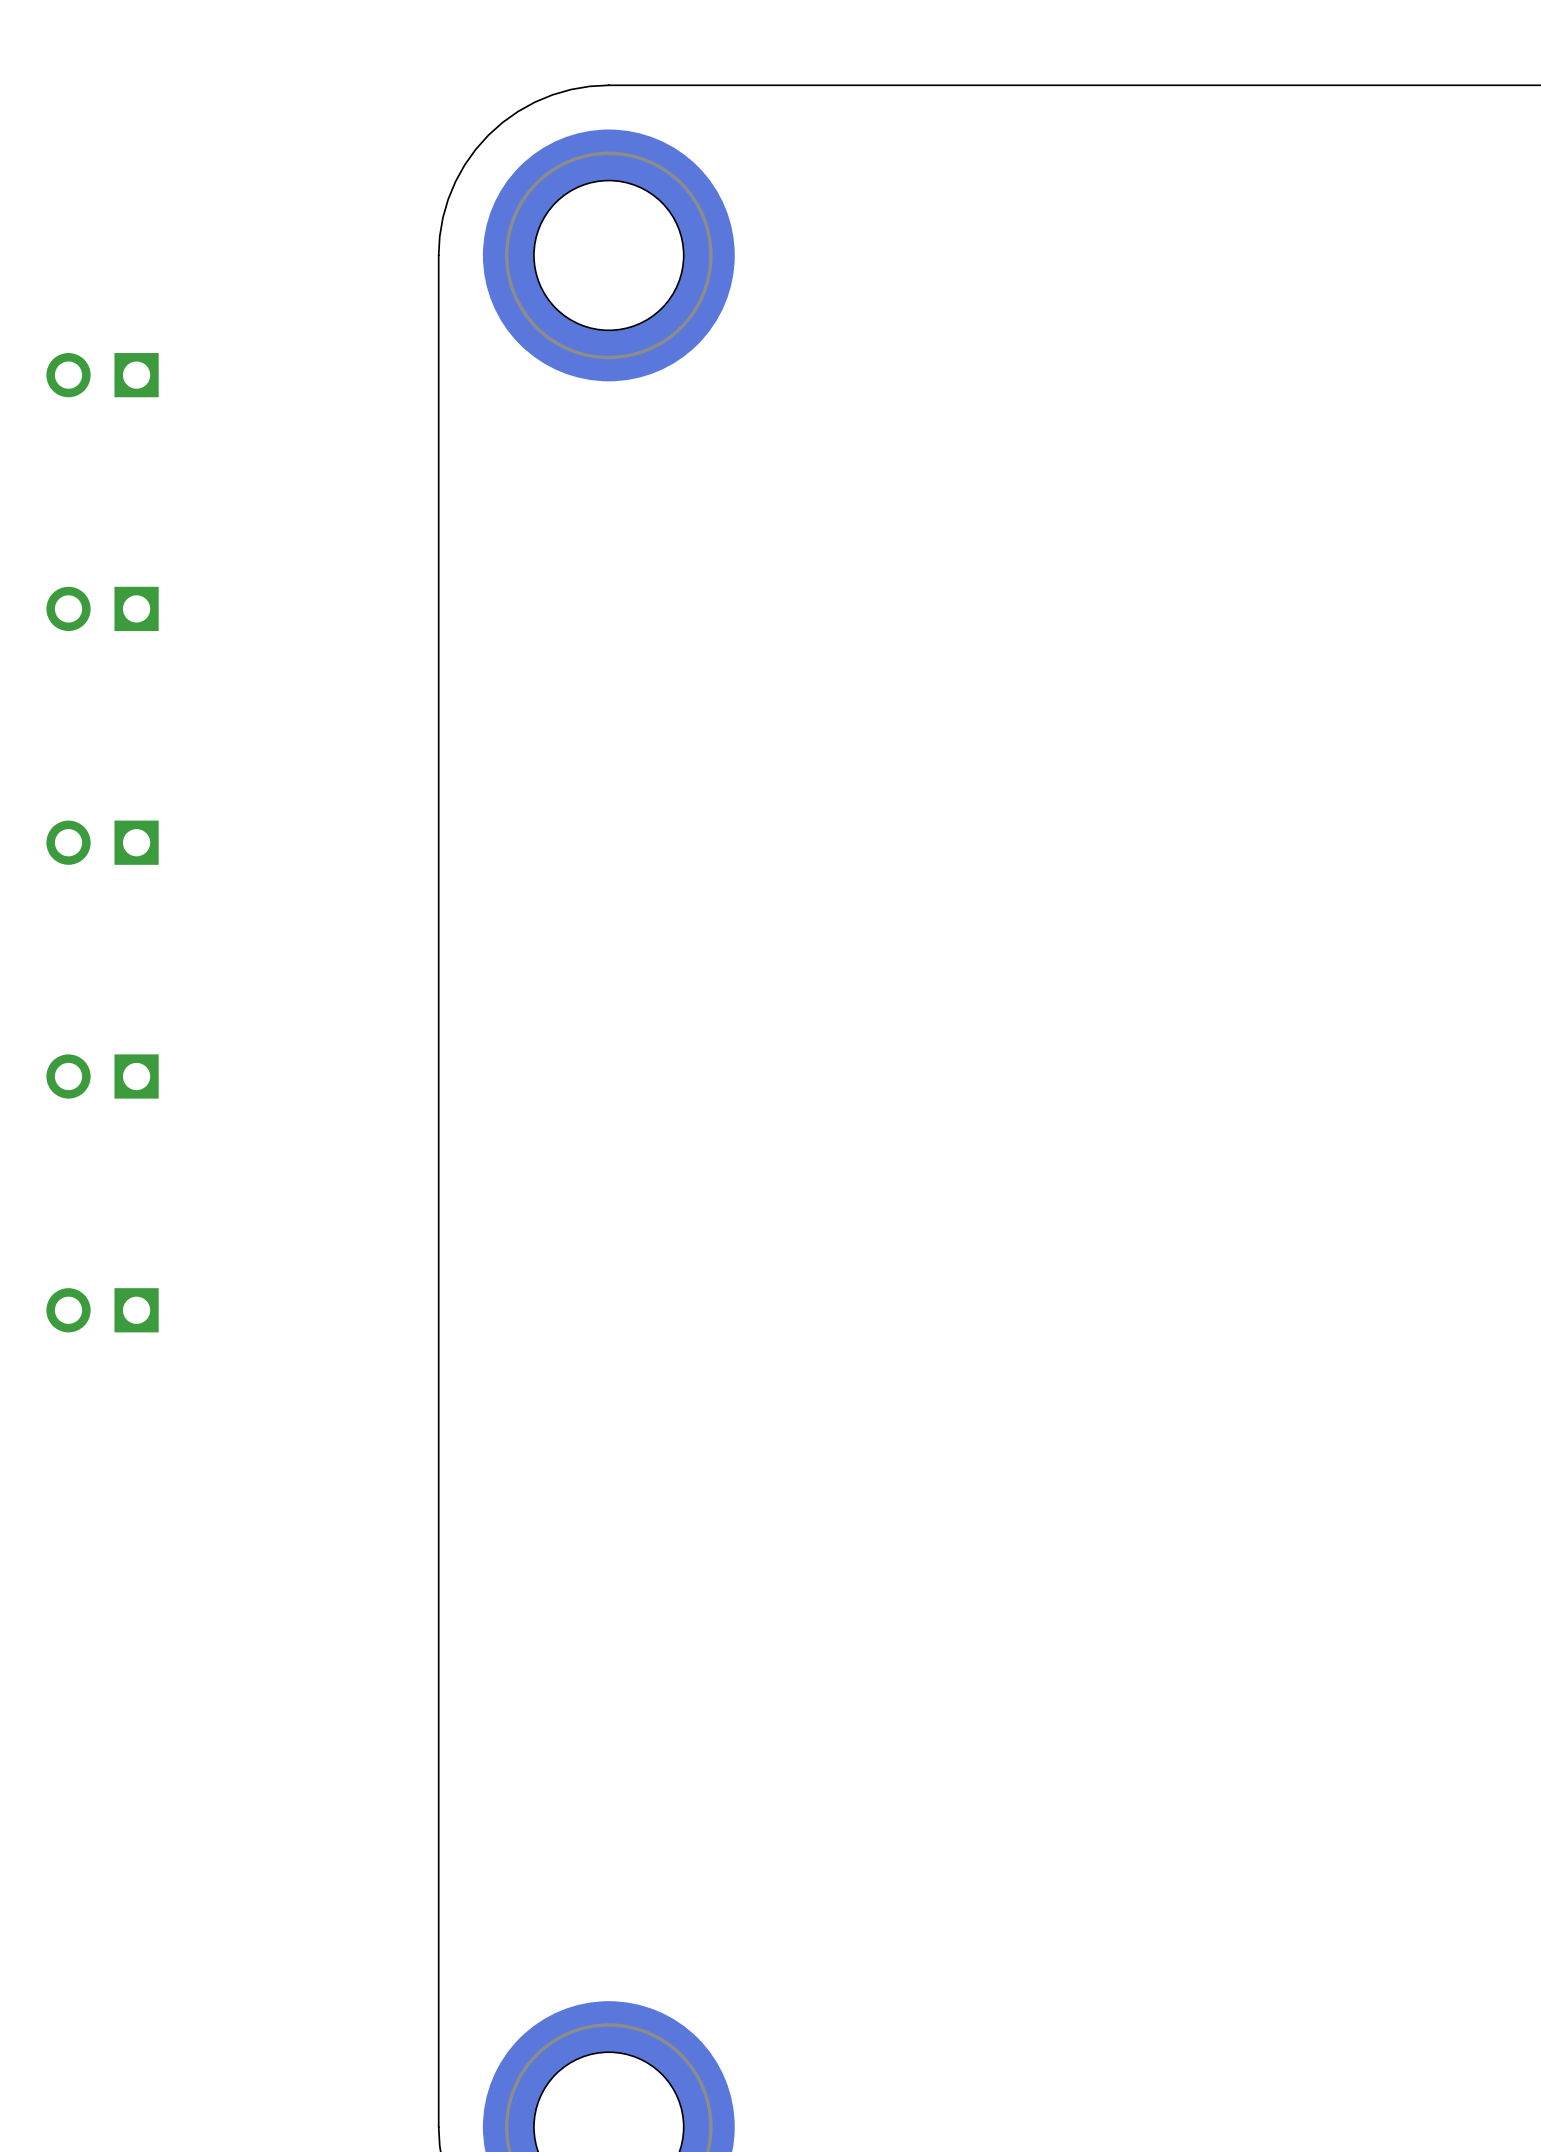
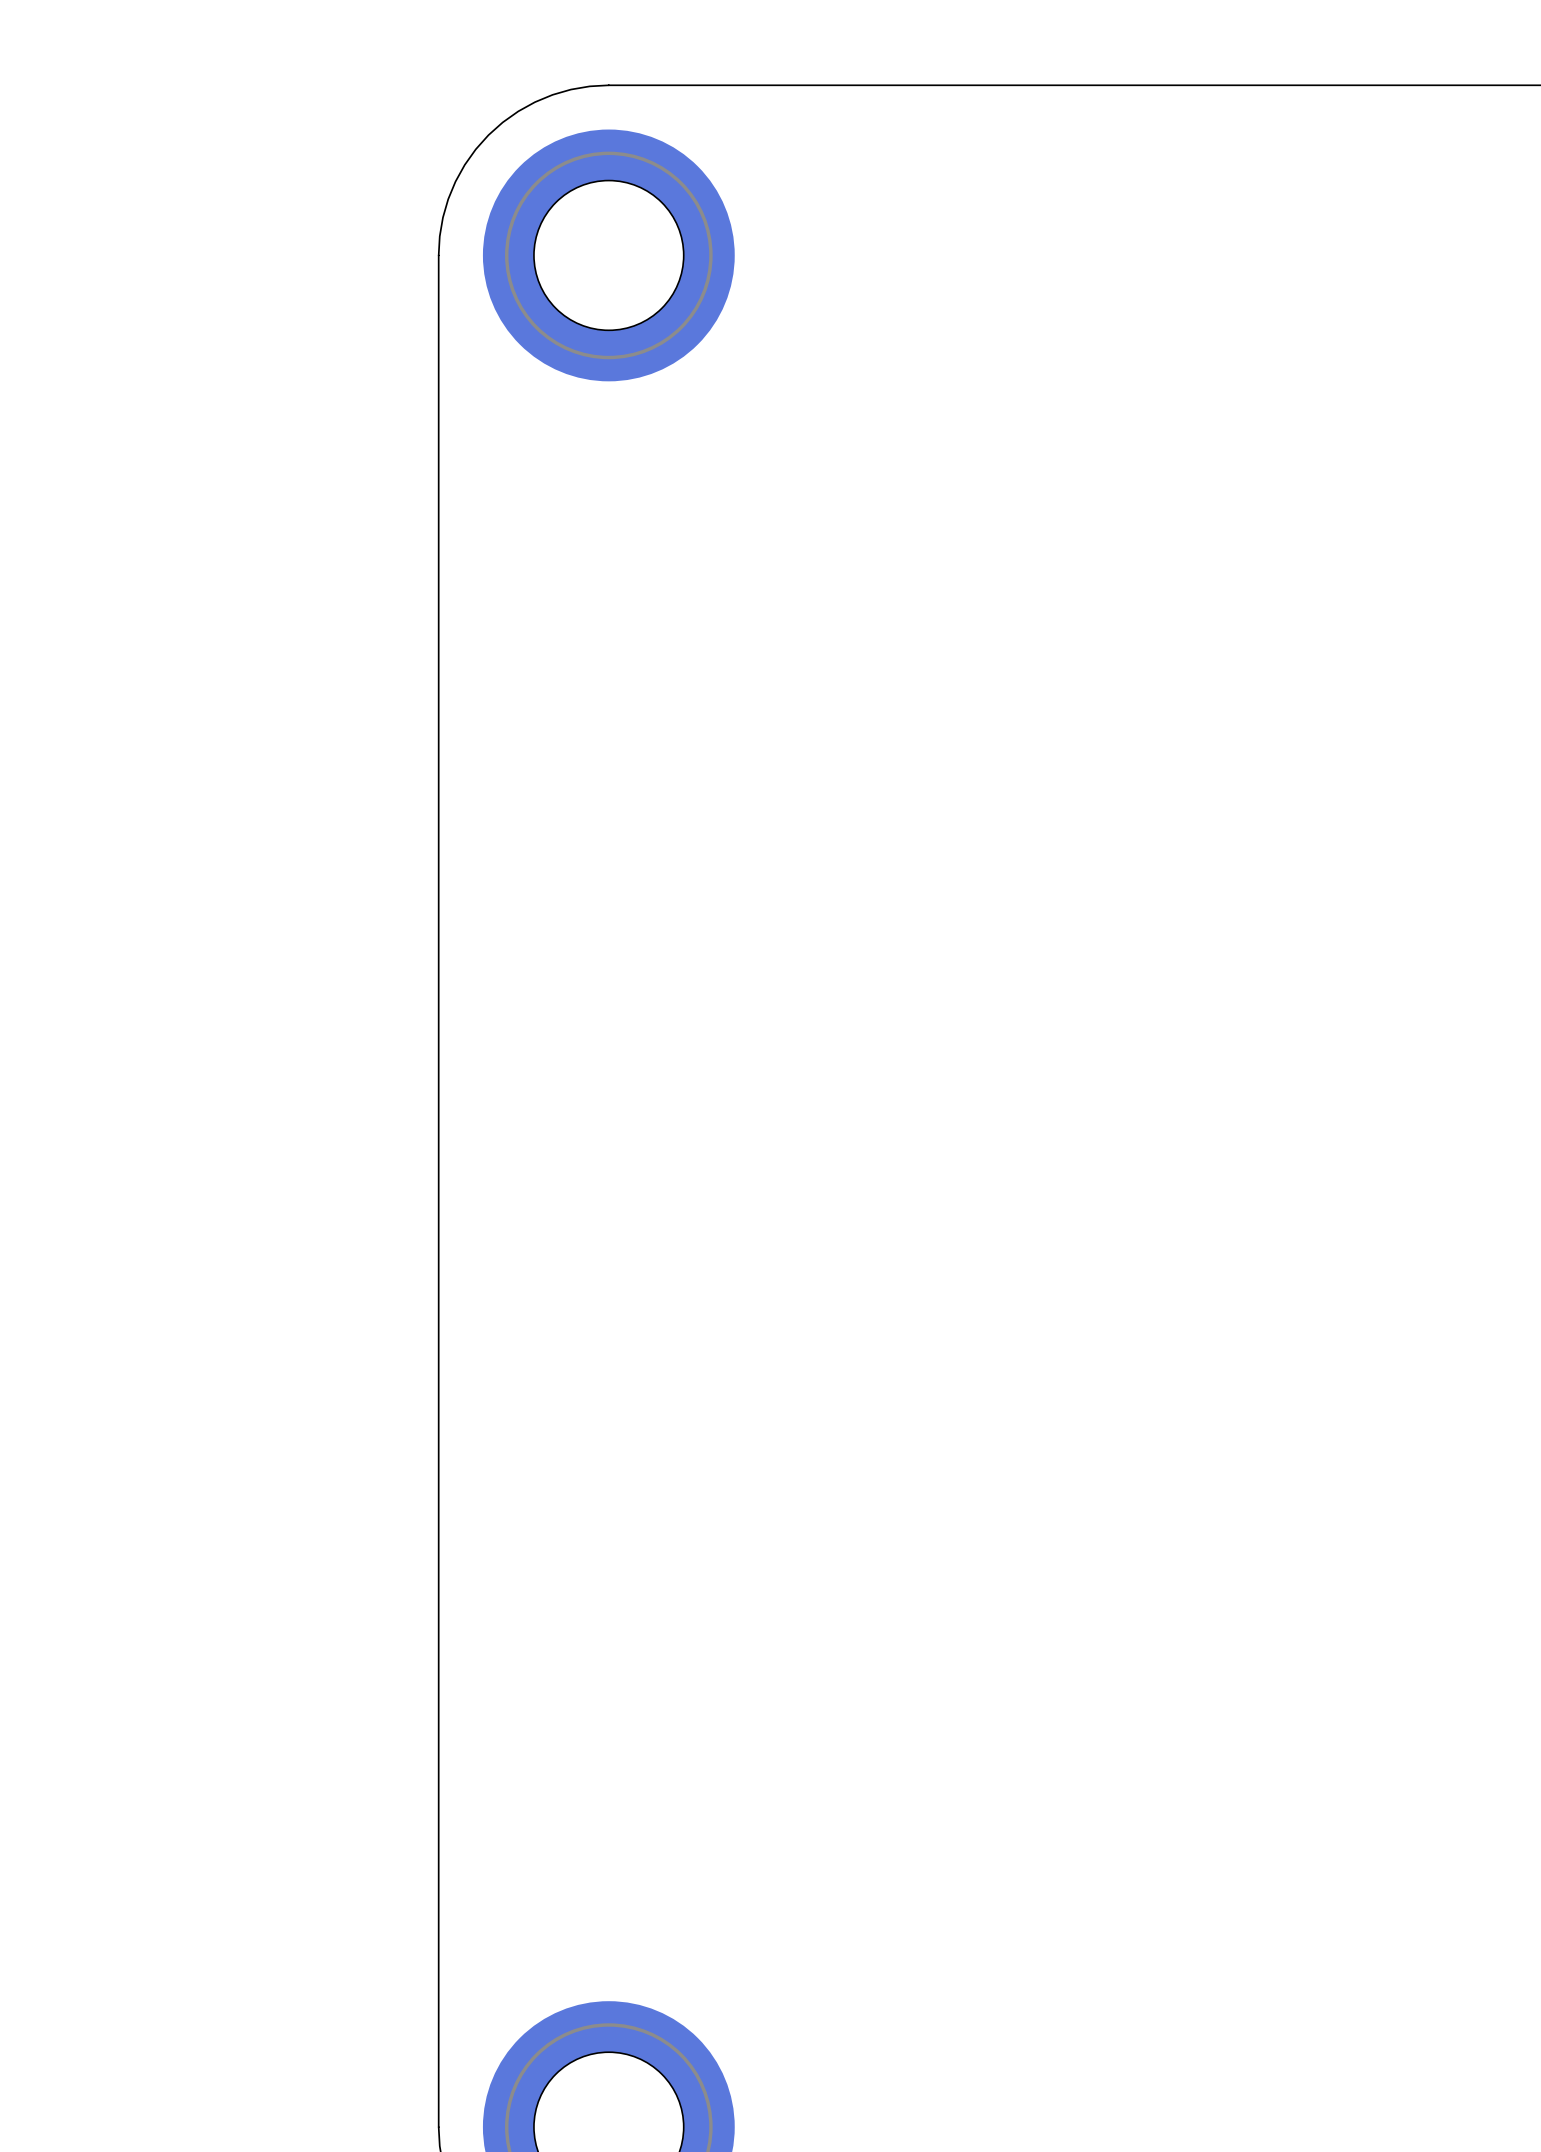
part: (102, 375) -> none
part: (102, 608) -> none
part: (102, 842) -> none
part: (102, 1076) -> none
part: (102, 1310) -> none

